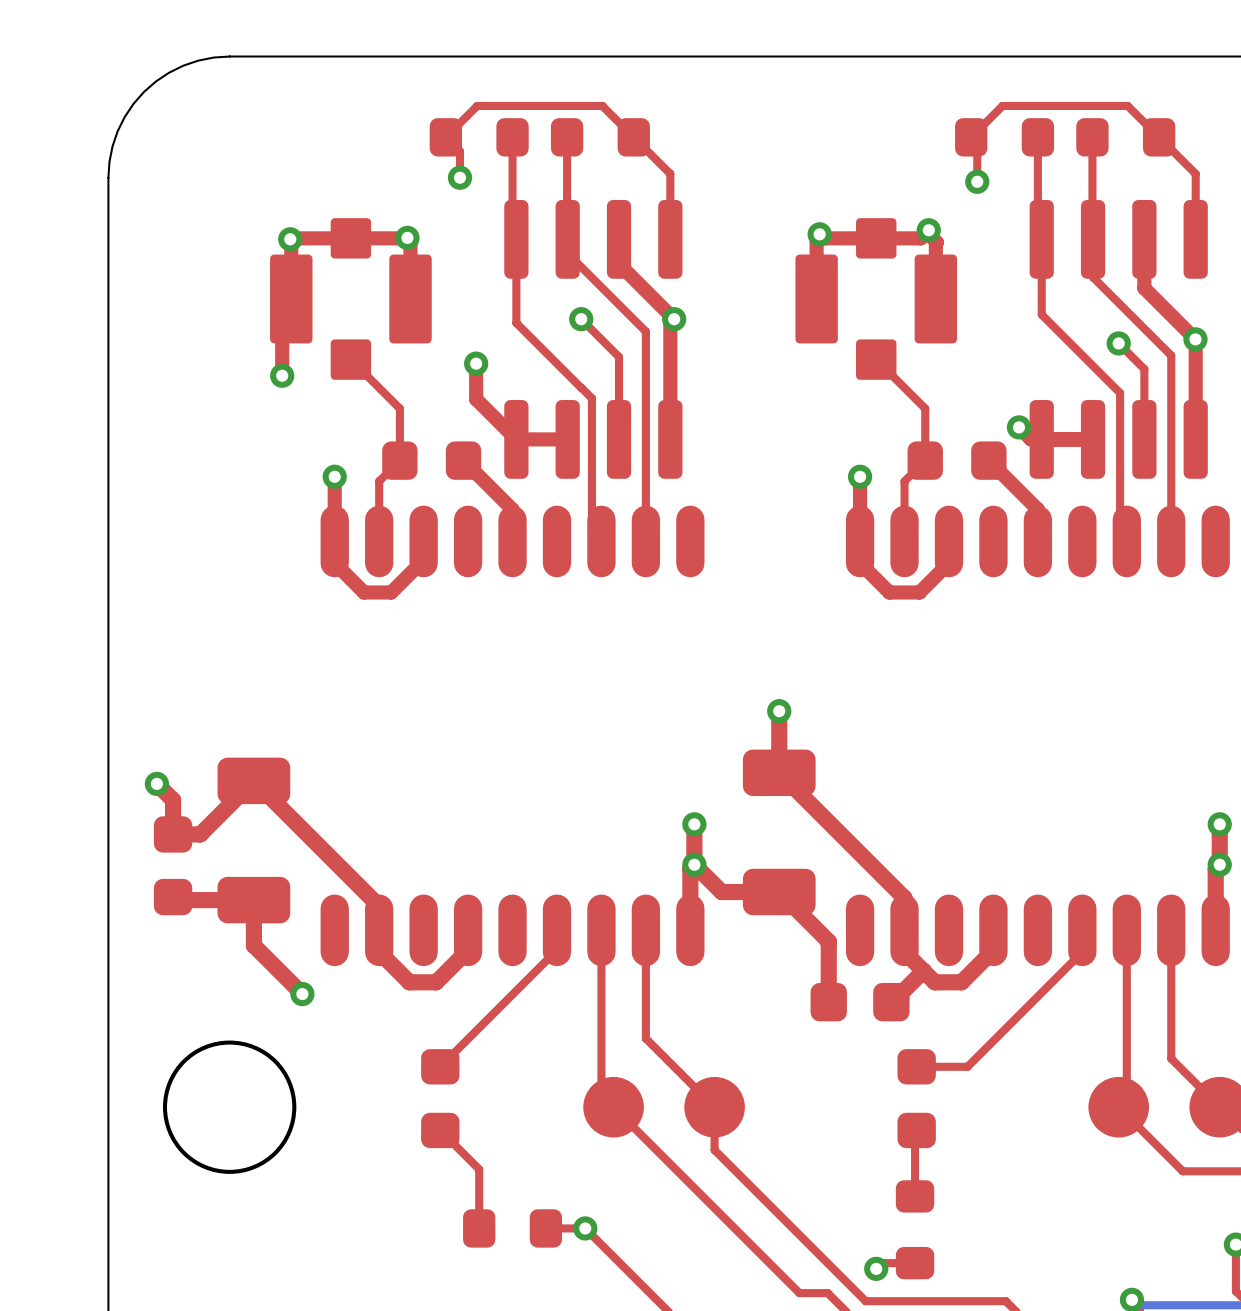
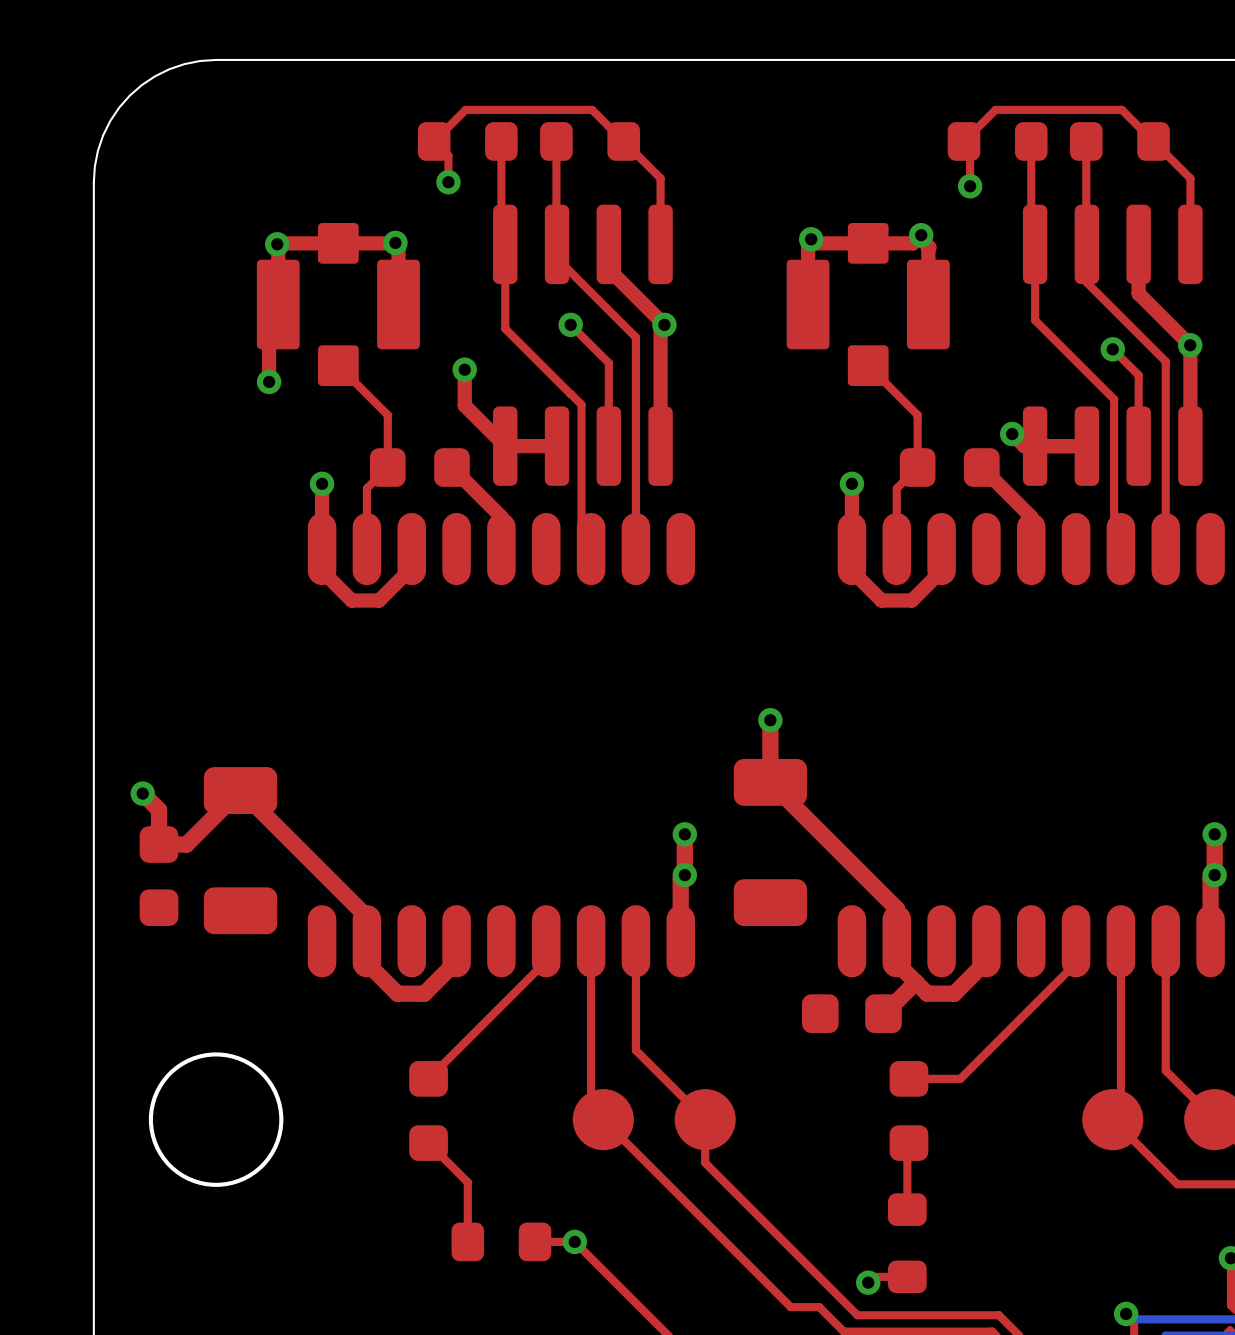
top track: (694, 864) (721, 892) (779, 892) (828, 941) (828, 1002) -> none
top track: (173, 897) (176, 900) (253, 900) (253, 945) (302, 994) -> none
via: (302, 994) -> none

